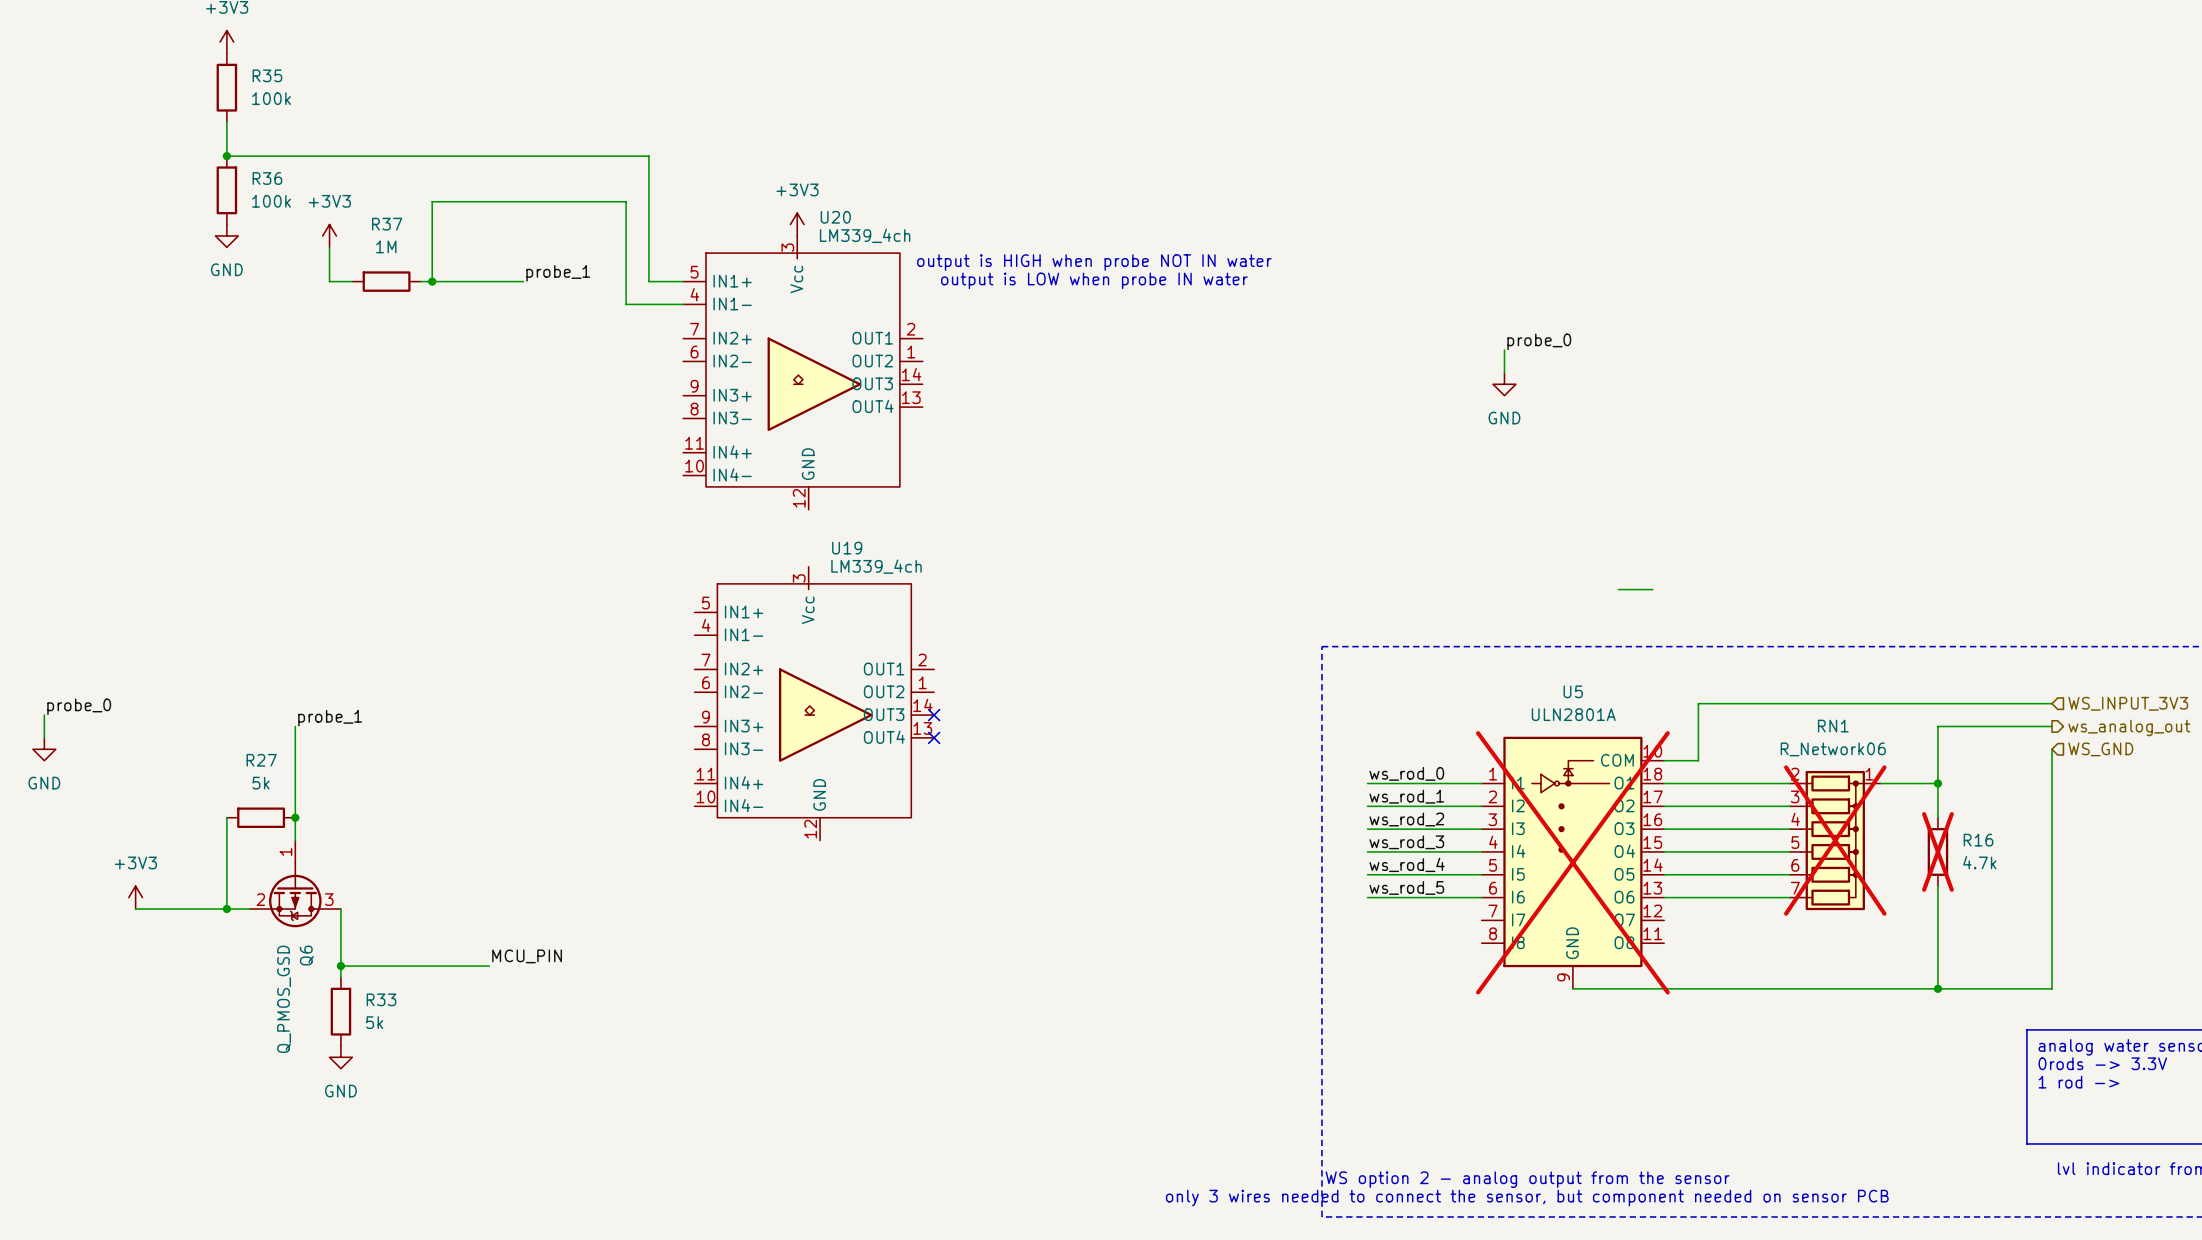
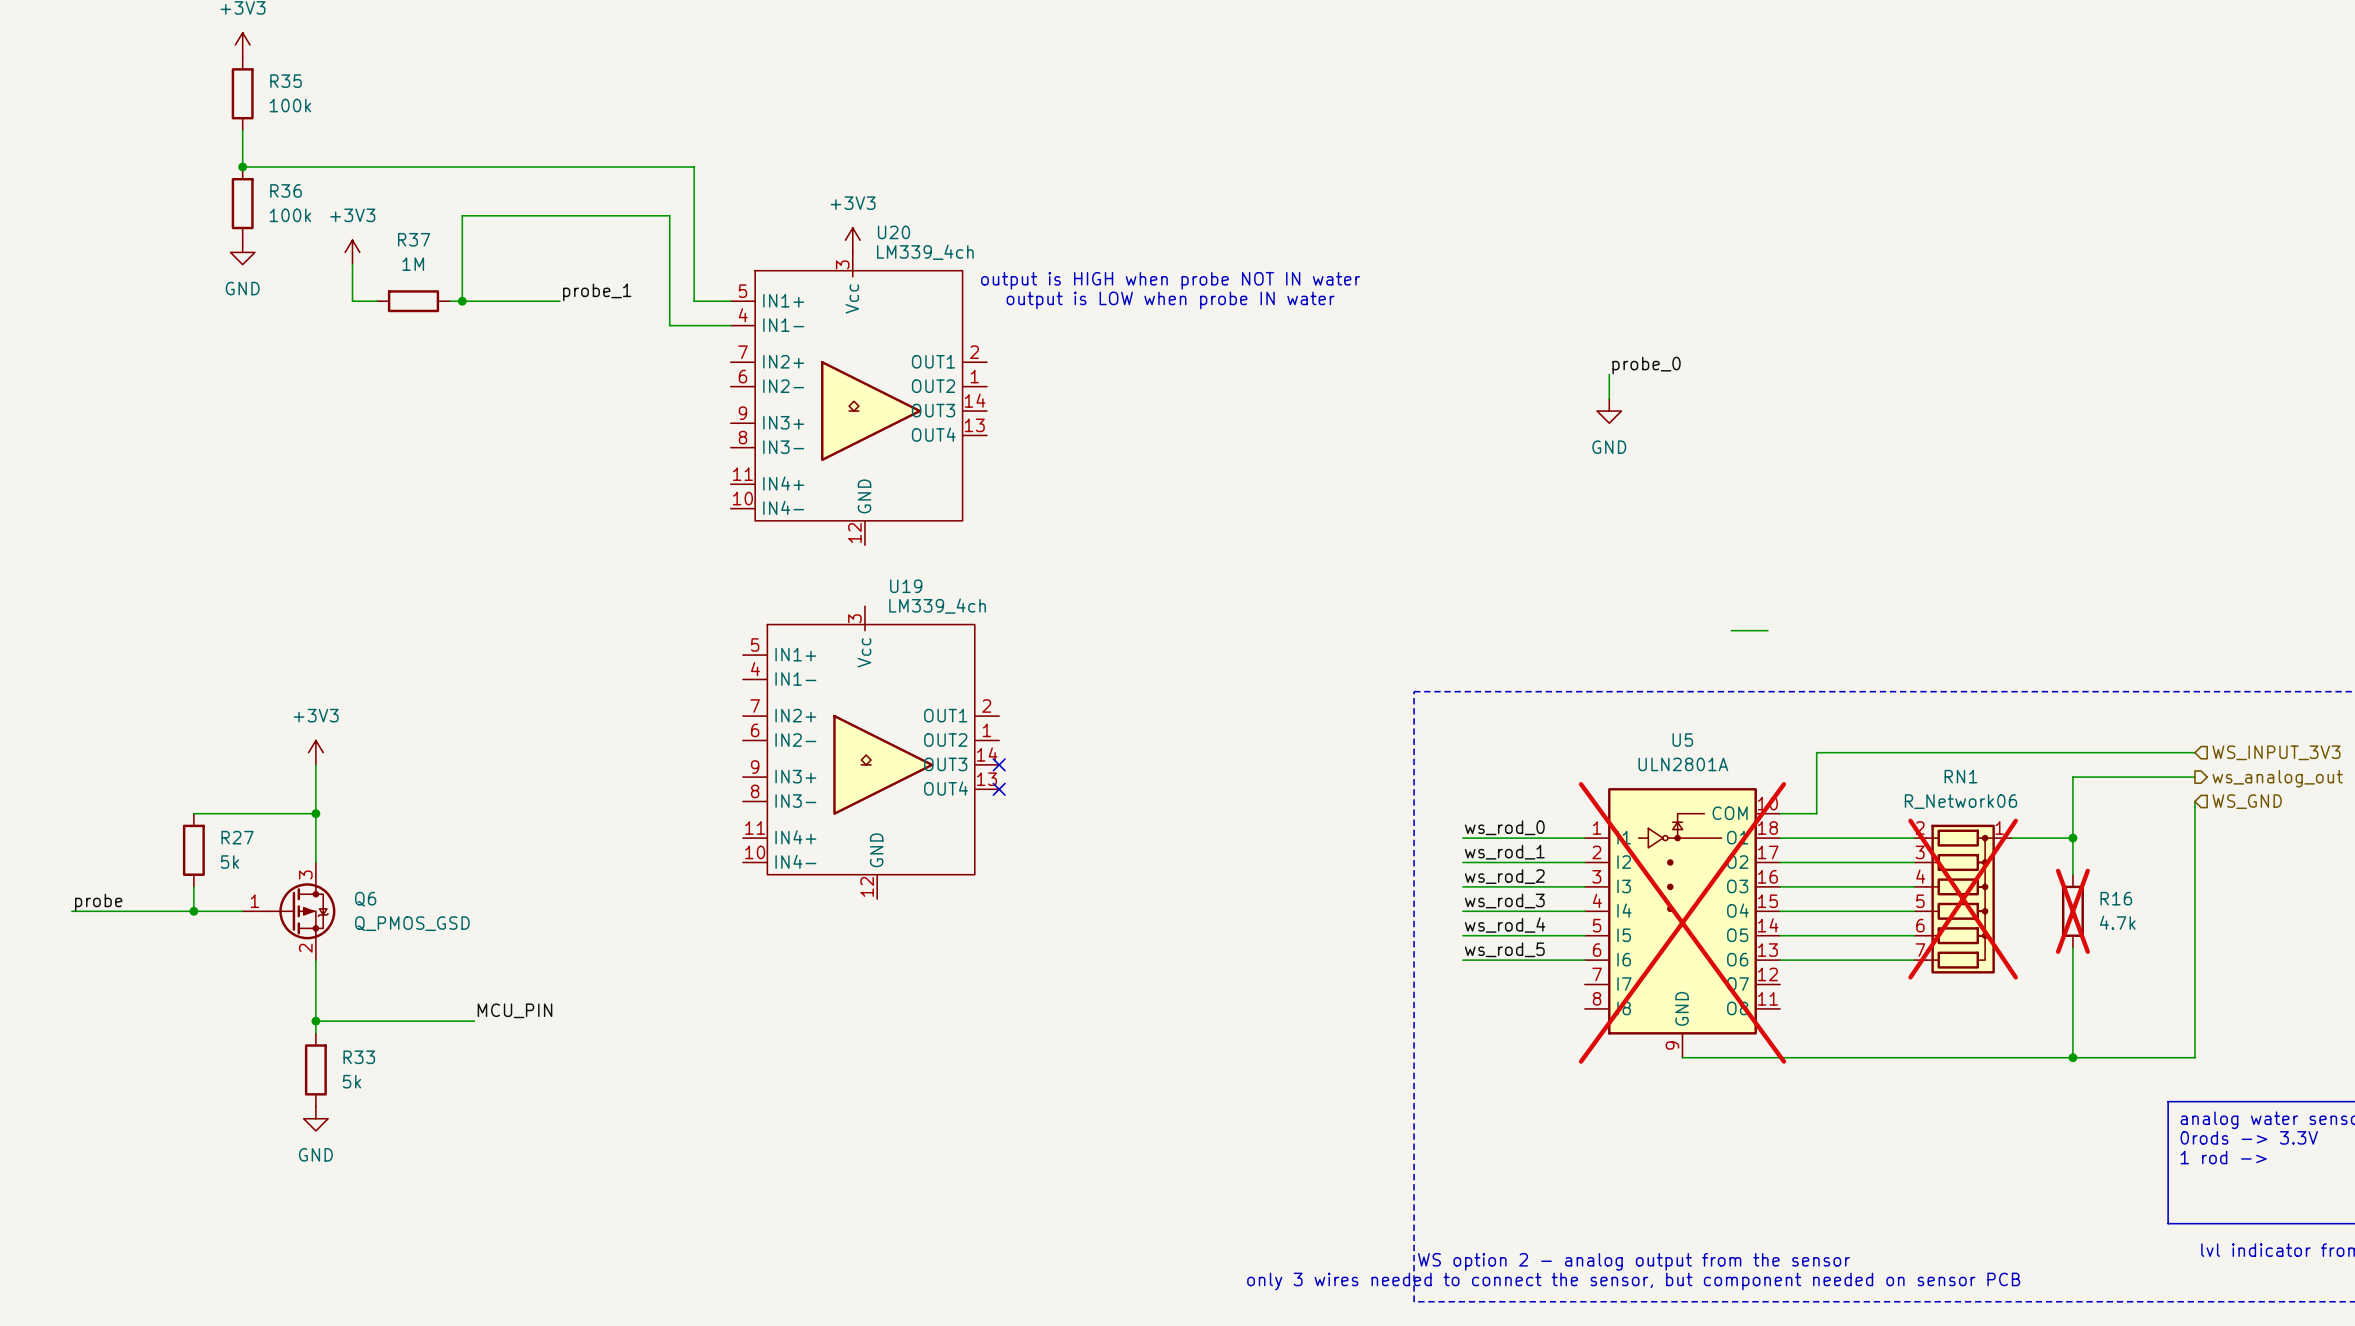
power symbol: none -> +3V3 (315, 752)
label: probe_0 (79, 706) -> none
wire: (44, 715) (44, 737) -> (193, 886) (193, 911)
wire: none -> (315, 764) (315, 777)
label: probe_1 (330, 718) -> none
power symbol: GND (44, 749) -> none
R27 name position: R27 (261, 760) -> R27 (237, 837)
junction: none -> (315, 813)
wire: (226, 817) (226, 909) -> none
R27 rotation: 0° (261, 817) -> 90° clockwise (193, 850)
R27 position: (261, 817) -> (193, 850)
junction: (295, 817) -> none
label: none -> probe (98, 902)
wire: none -> (71, 911) (242, 911)
junction: none -> (193, 911)
Q6 rotation: 0° (295, 895) -> 90° counterclockwise (301, 911)
power symbol: +3V3 (135, 897) -> none
wire: (135, 909) (249, 909) -> (193, 813) (315, 813)
junction: (226, 909) -> none
wire: (340, 909) (340, 977) -> (315, 960) (315, 1033)
junction: none -> (315, 1021)
label position: MCU_PIN (527, 956) -> MCU_PIN (514, 1010)
wire: (340, 966) (489, 966) -> (315, 1021) (474, 1021)
junction: (340, 966) -> none
R33 position: (340, 1011) -> (315, 1069)
power symbol position: GND (340, 1057) -> GND (315, 1118)

